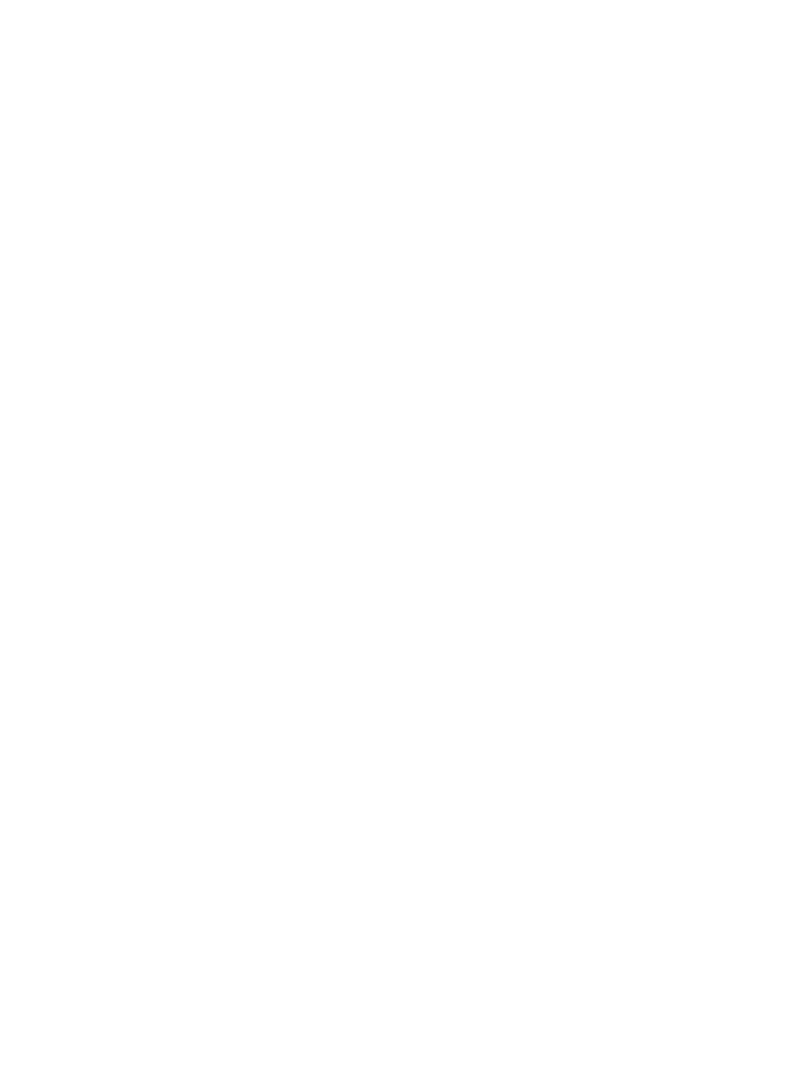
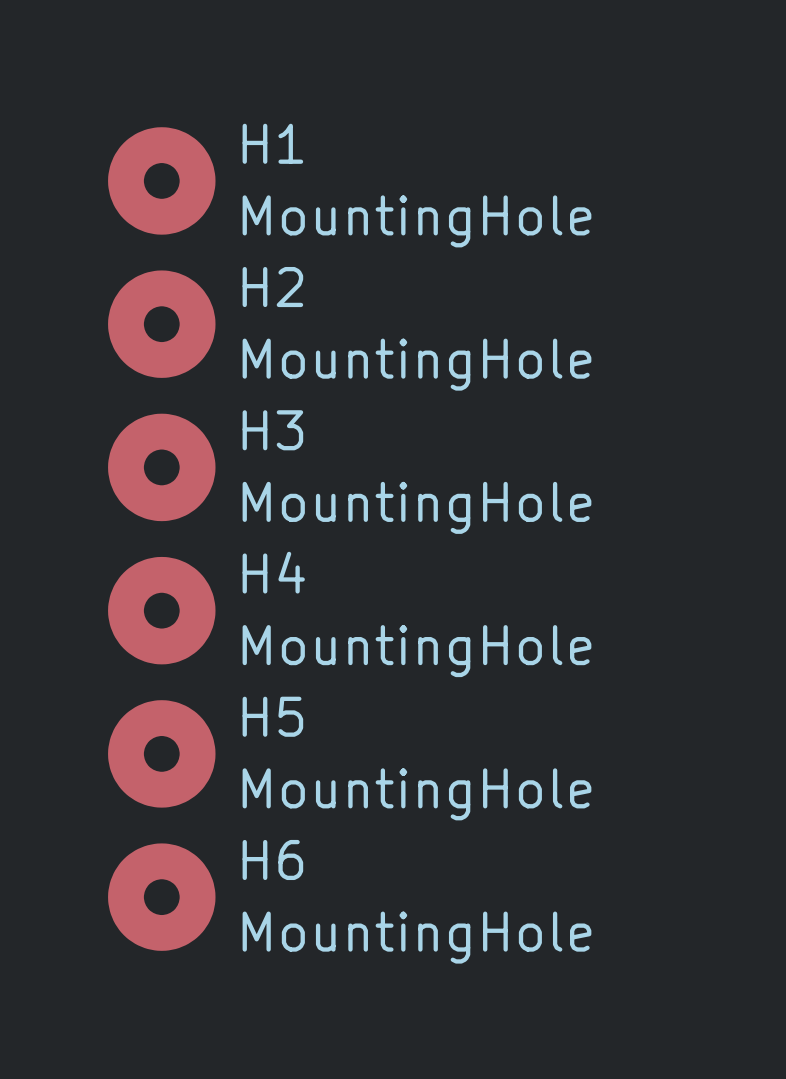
H1: none -> MountingHole (161, 180)
H2: none -> MountingHole (161, 324)
H3: none -> MountingHole (161, 467)
H4: none -> MountingHole (161, 610)
H5: none -> MountingHole (161, 753)
H6: none -> MountingHole (161, 897)

